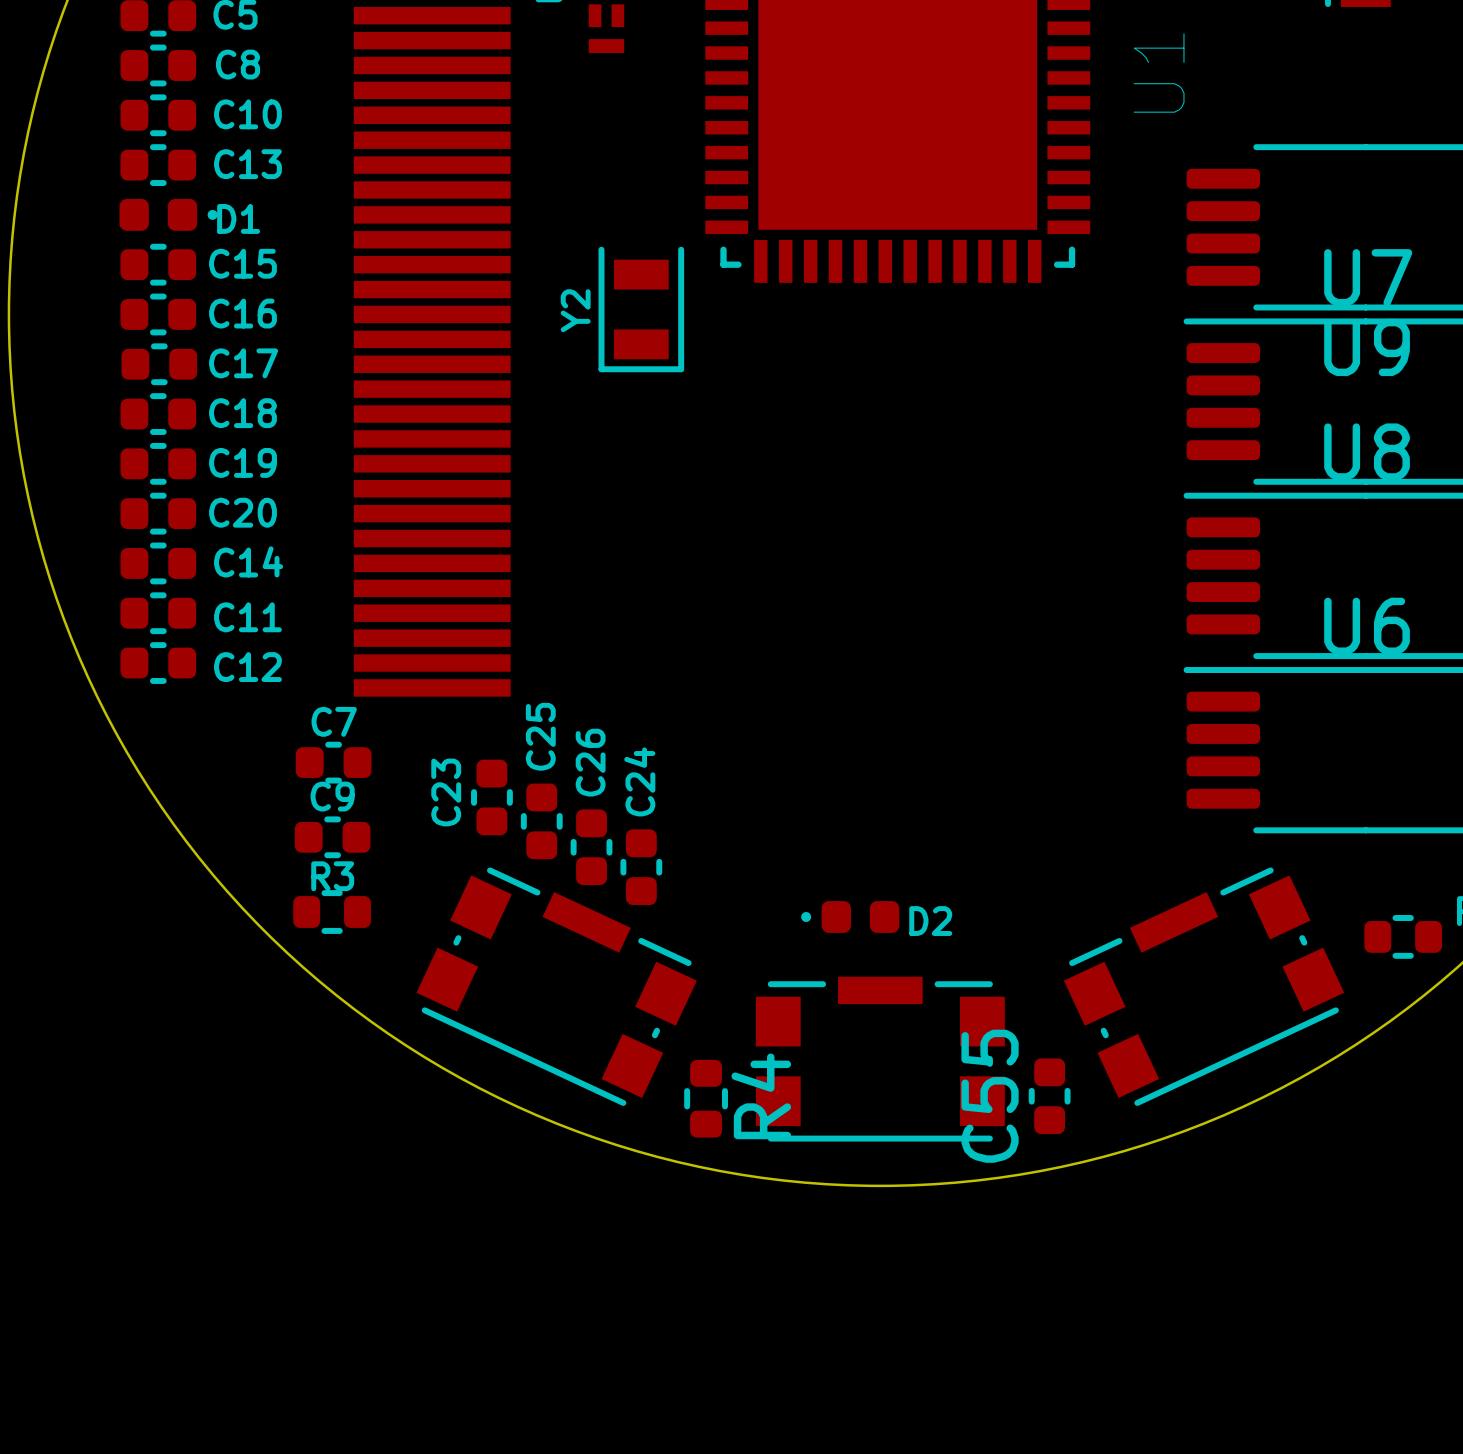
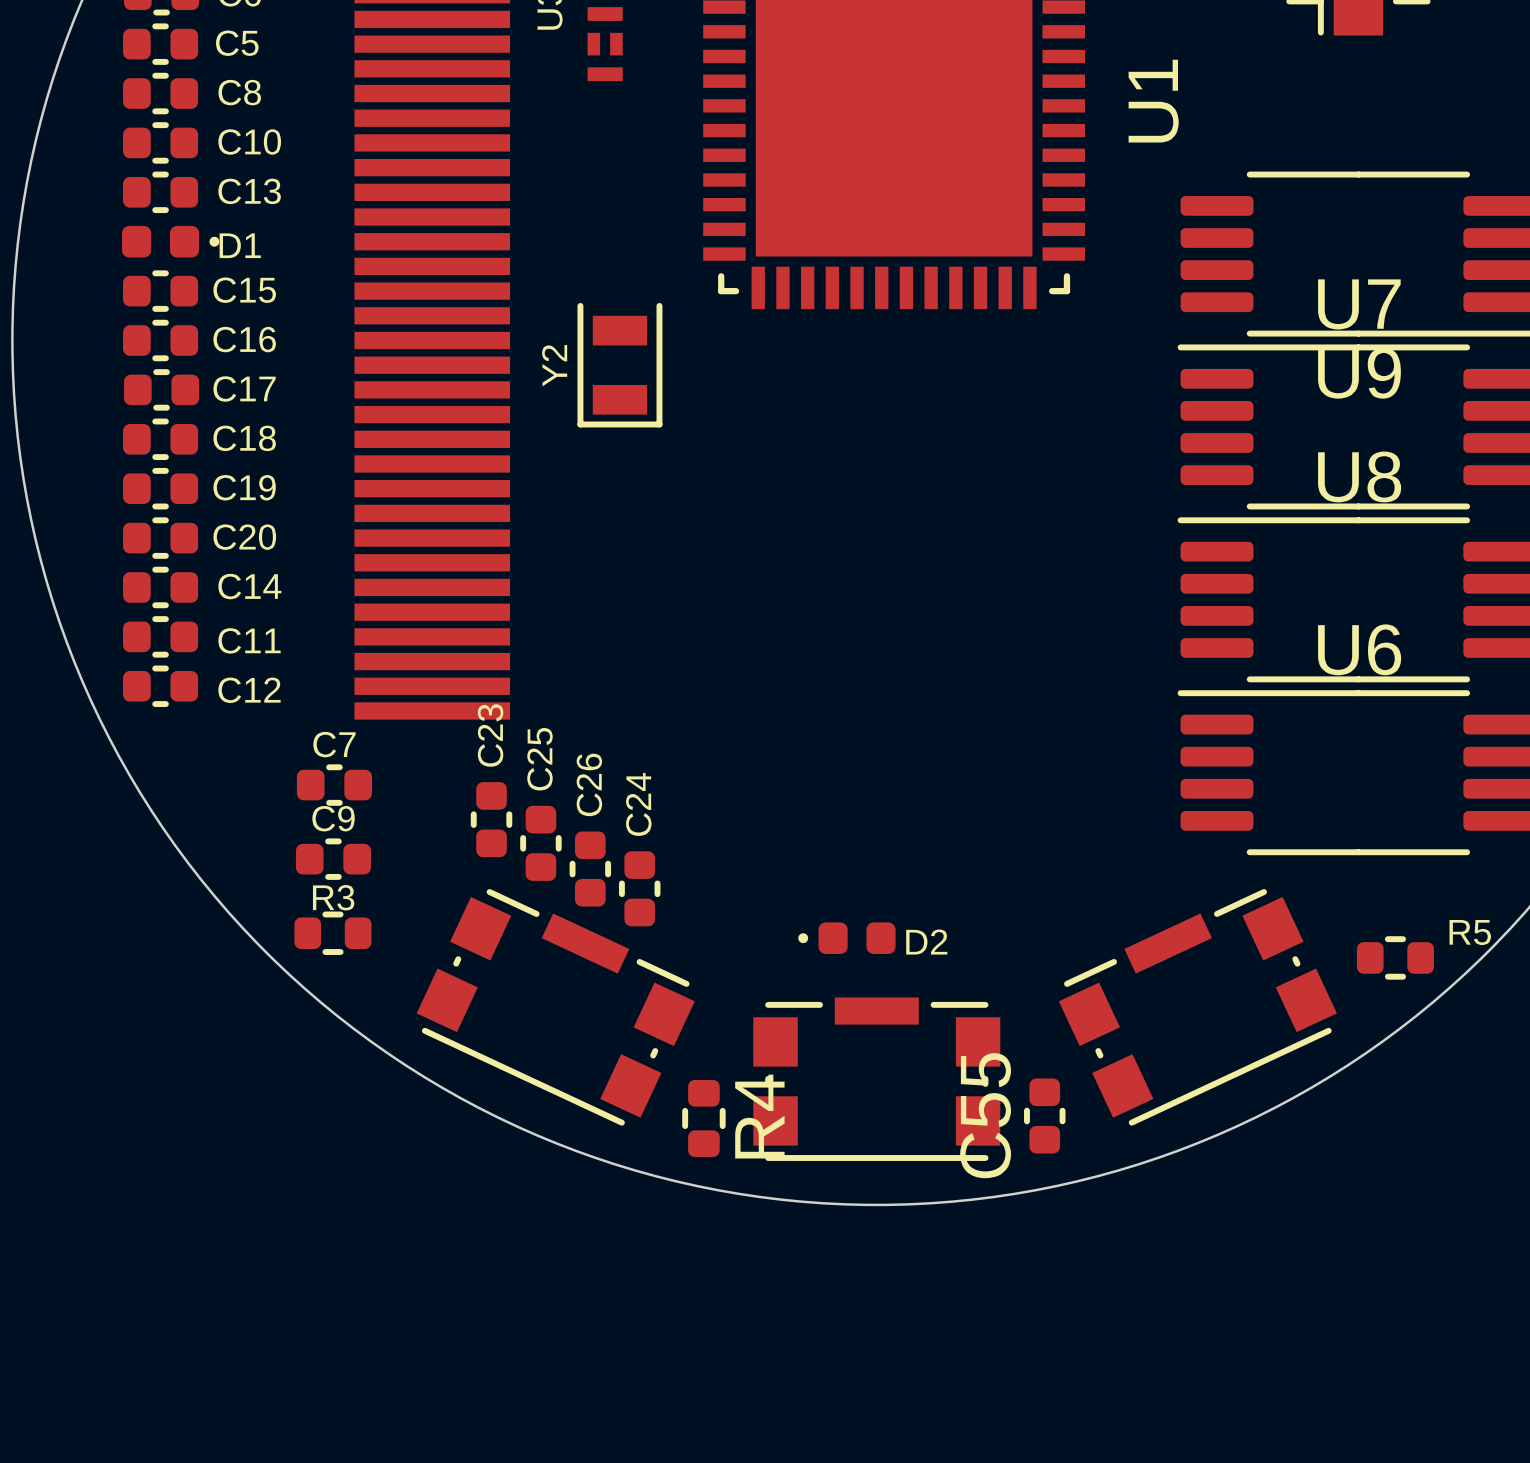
Y2 position: (641, 309) -> (619, 365)
C23 name position: C23 (446, 792) -> C23 (490, 735)

